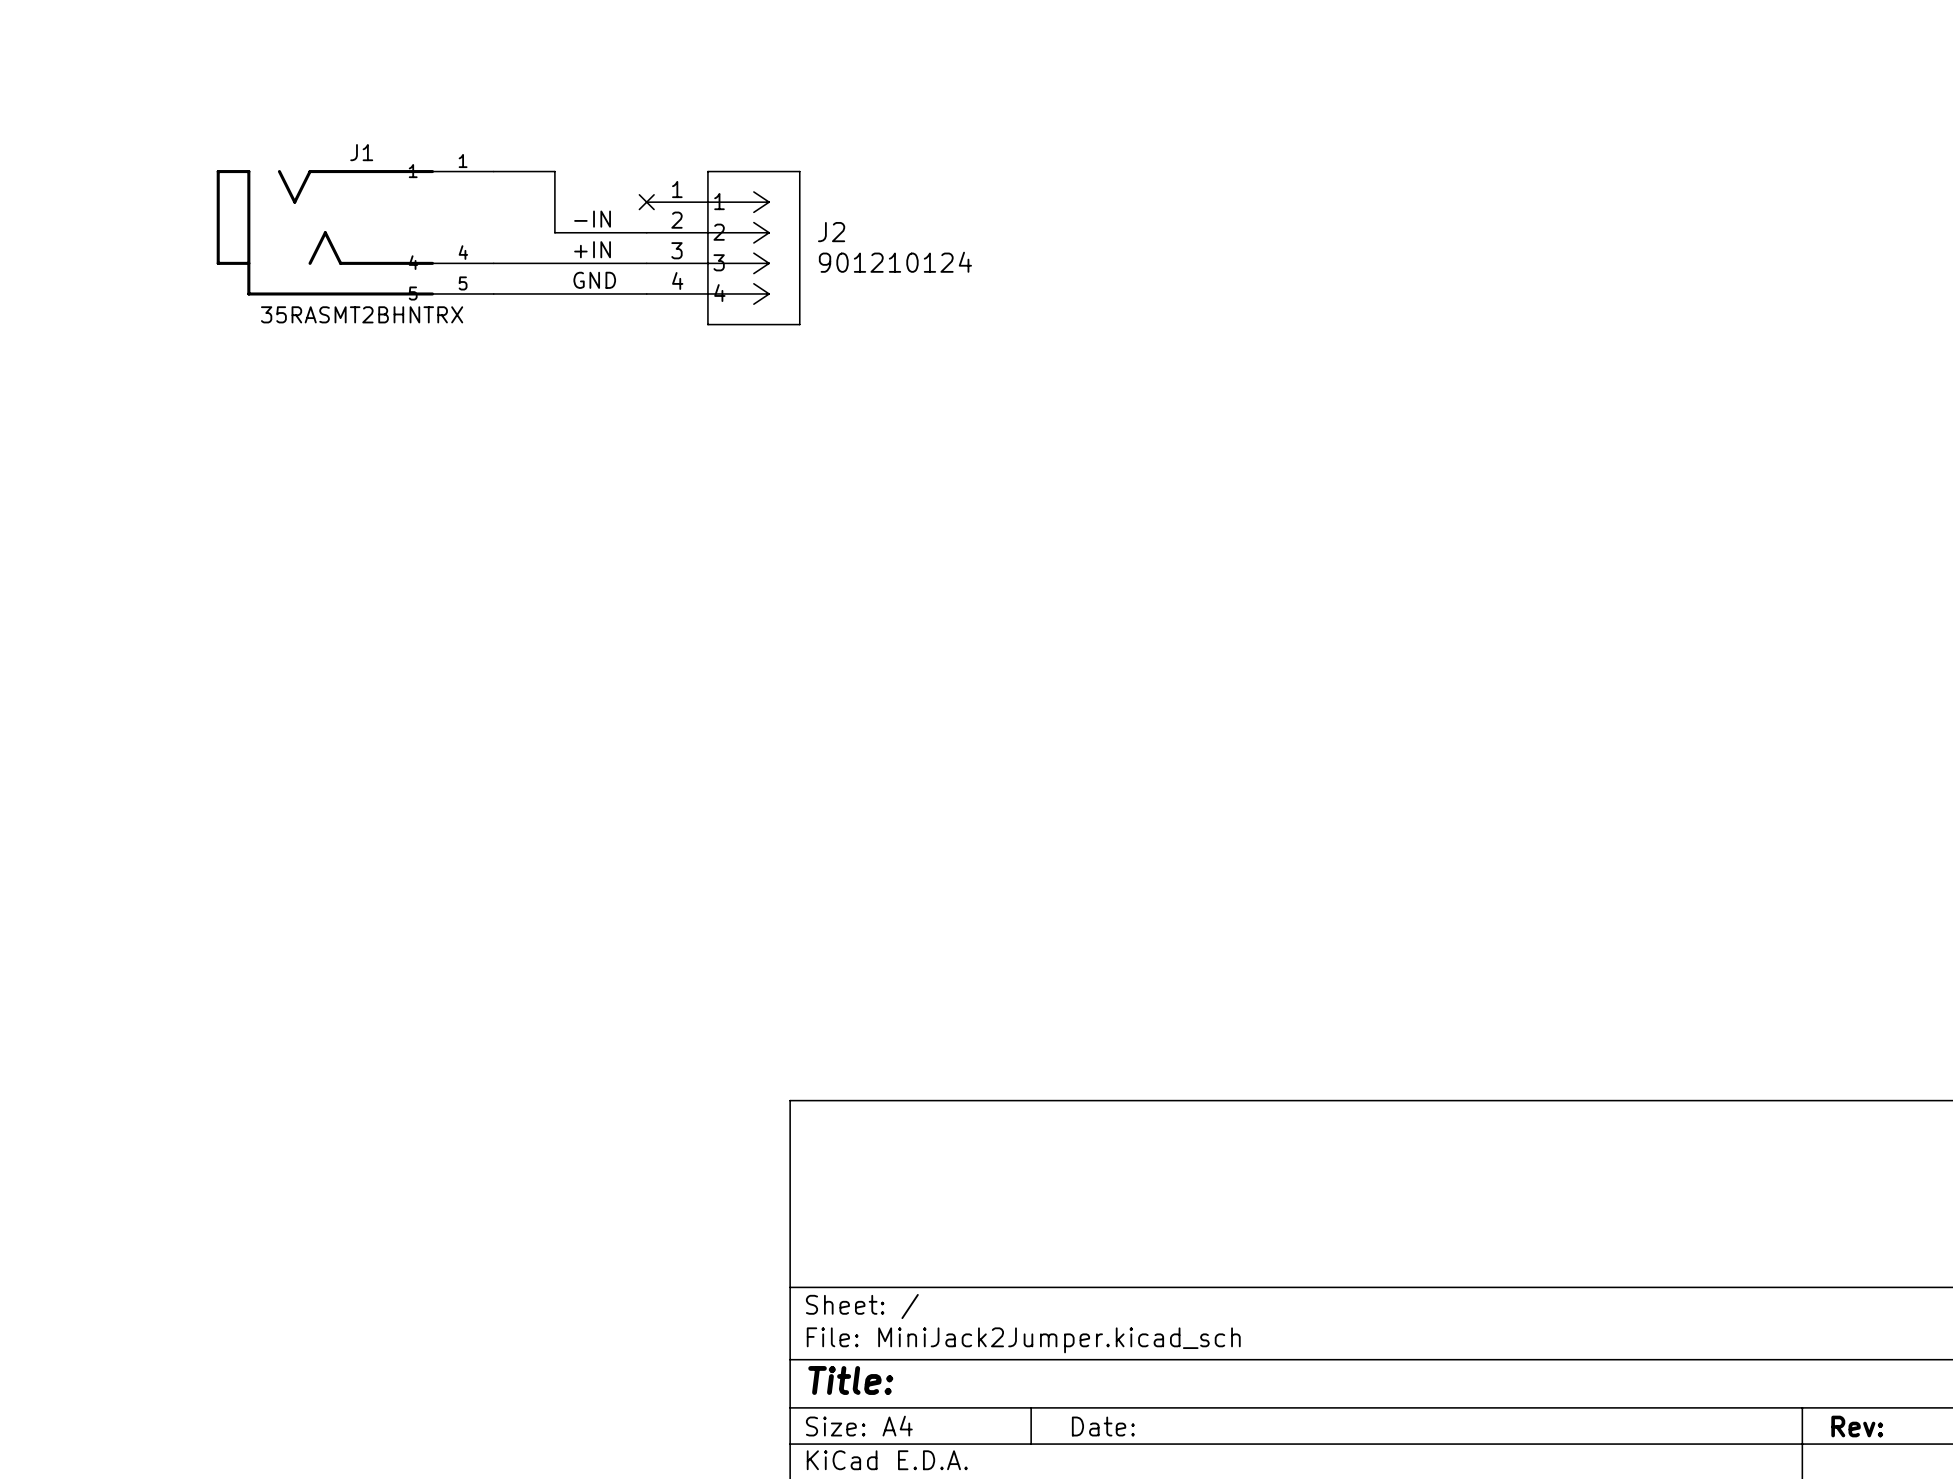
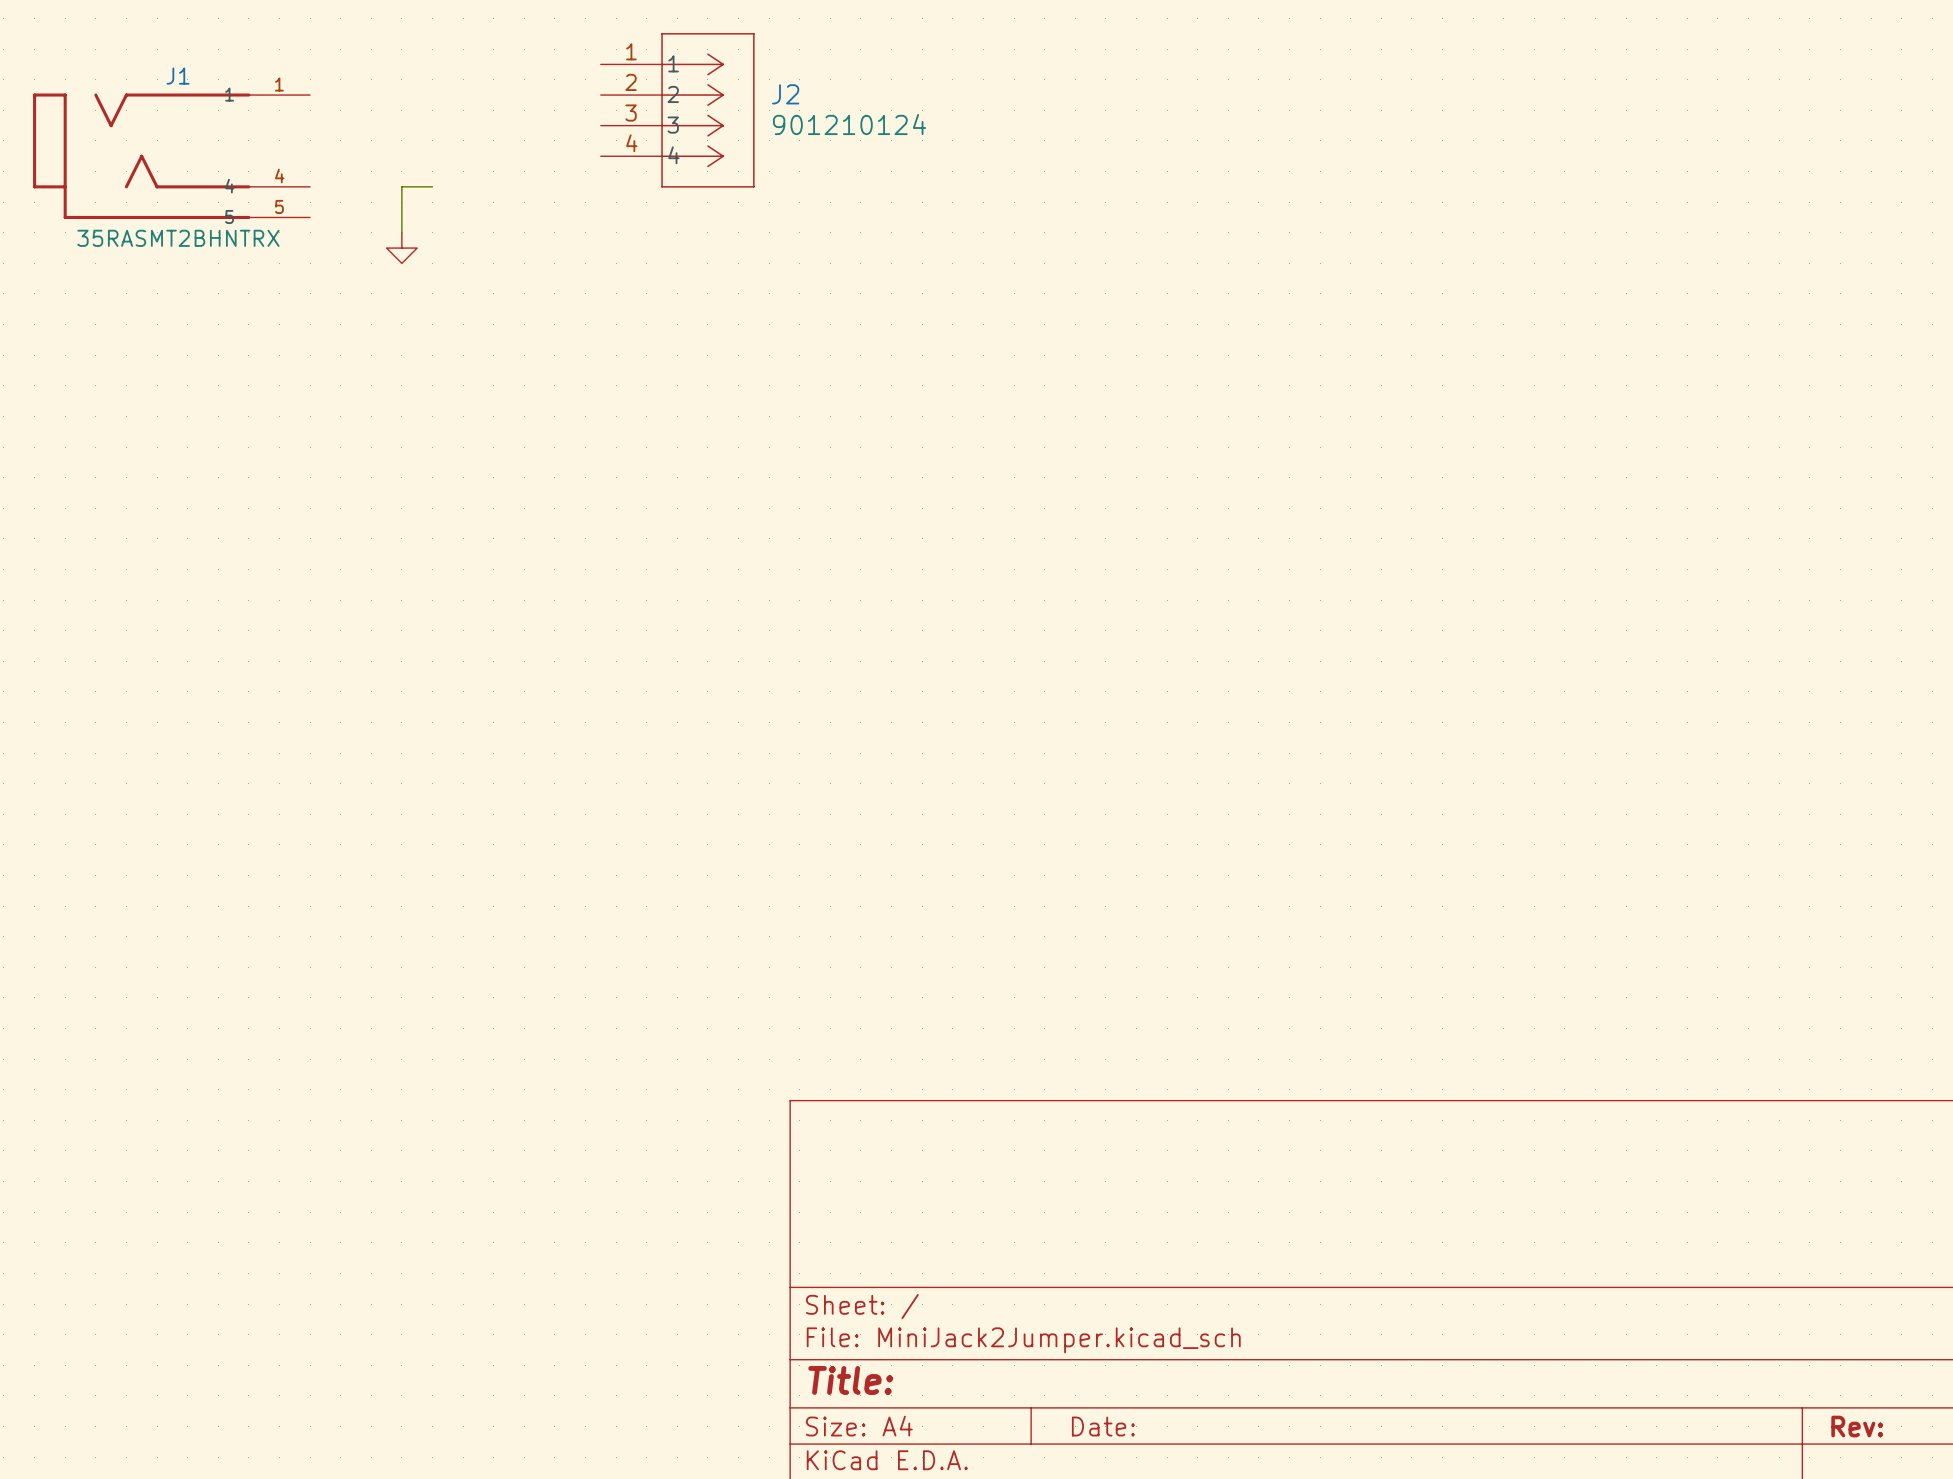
wire: (493, 171) (554, 171) (554, 232) (646, 232) -> none
wire: none -> (432, 186) (401, 186) (401, 232)
no-connect mark: (646, 202) -> none
label: -IN (592, 219) -> none
J1 position: (355, 232) -> (171, 156)
power symbol: none -> (401, 248)
J2 position: (723, 248) -> (677, 110)
label: +IN (592, 249) -> none
wire: (493, 263) (646, 263) -> none
label: GND (594, 280) -> none
wire: (493, 293) (646, 293) -> none

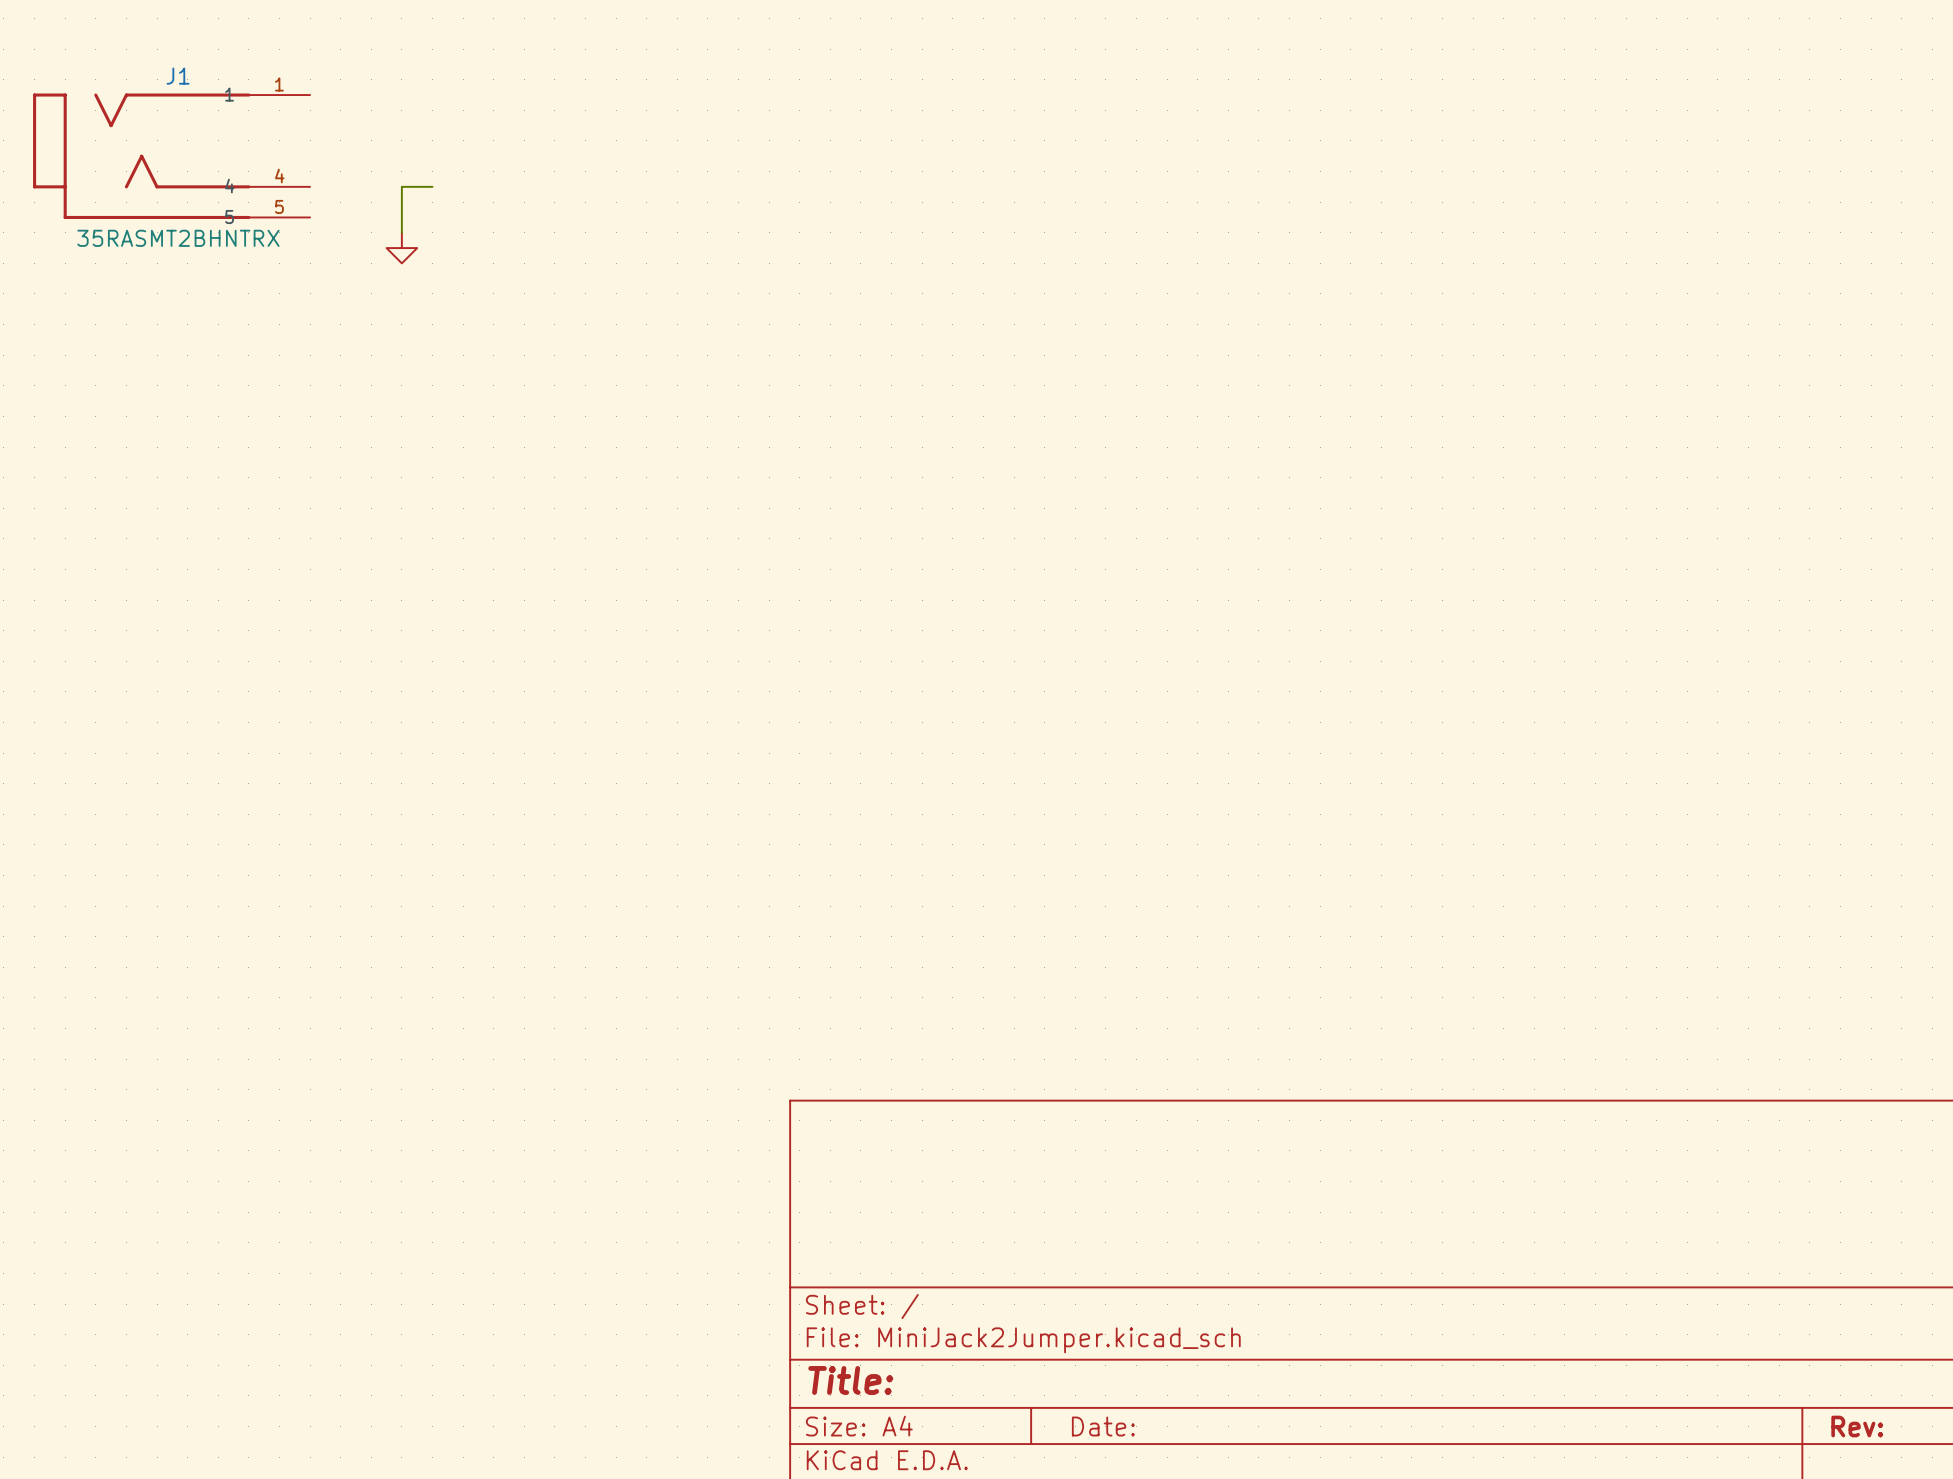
J2: 901210124 (677, 110) -> none

